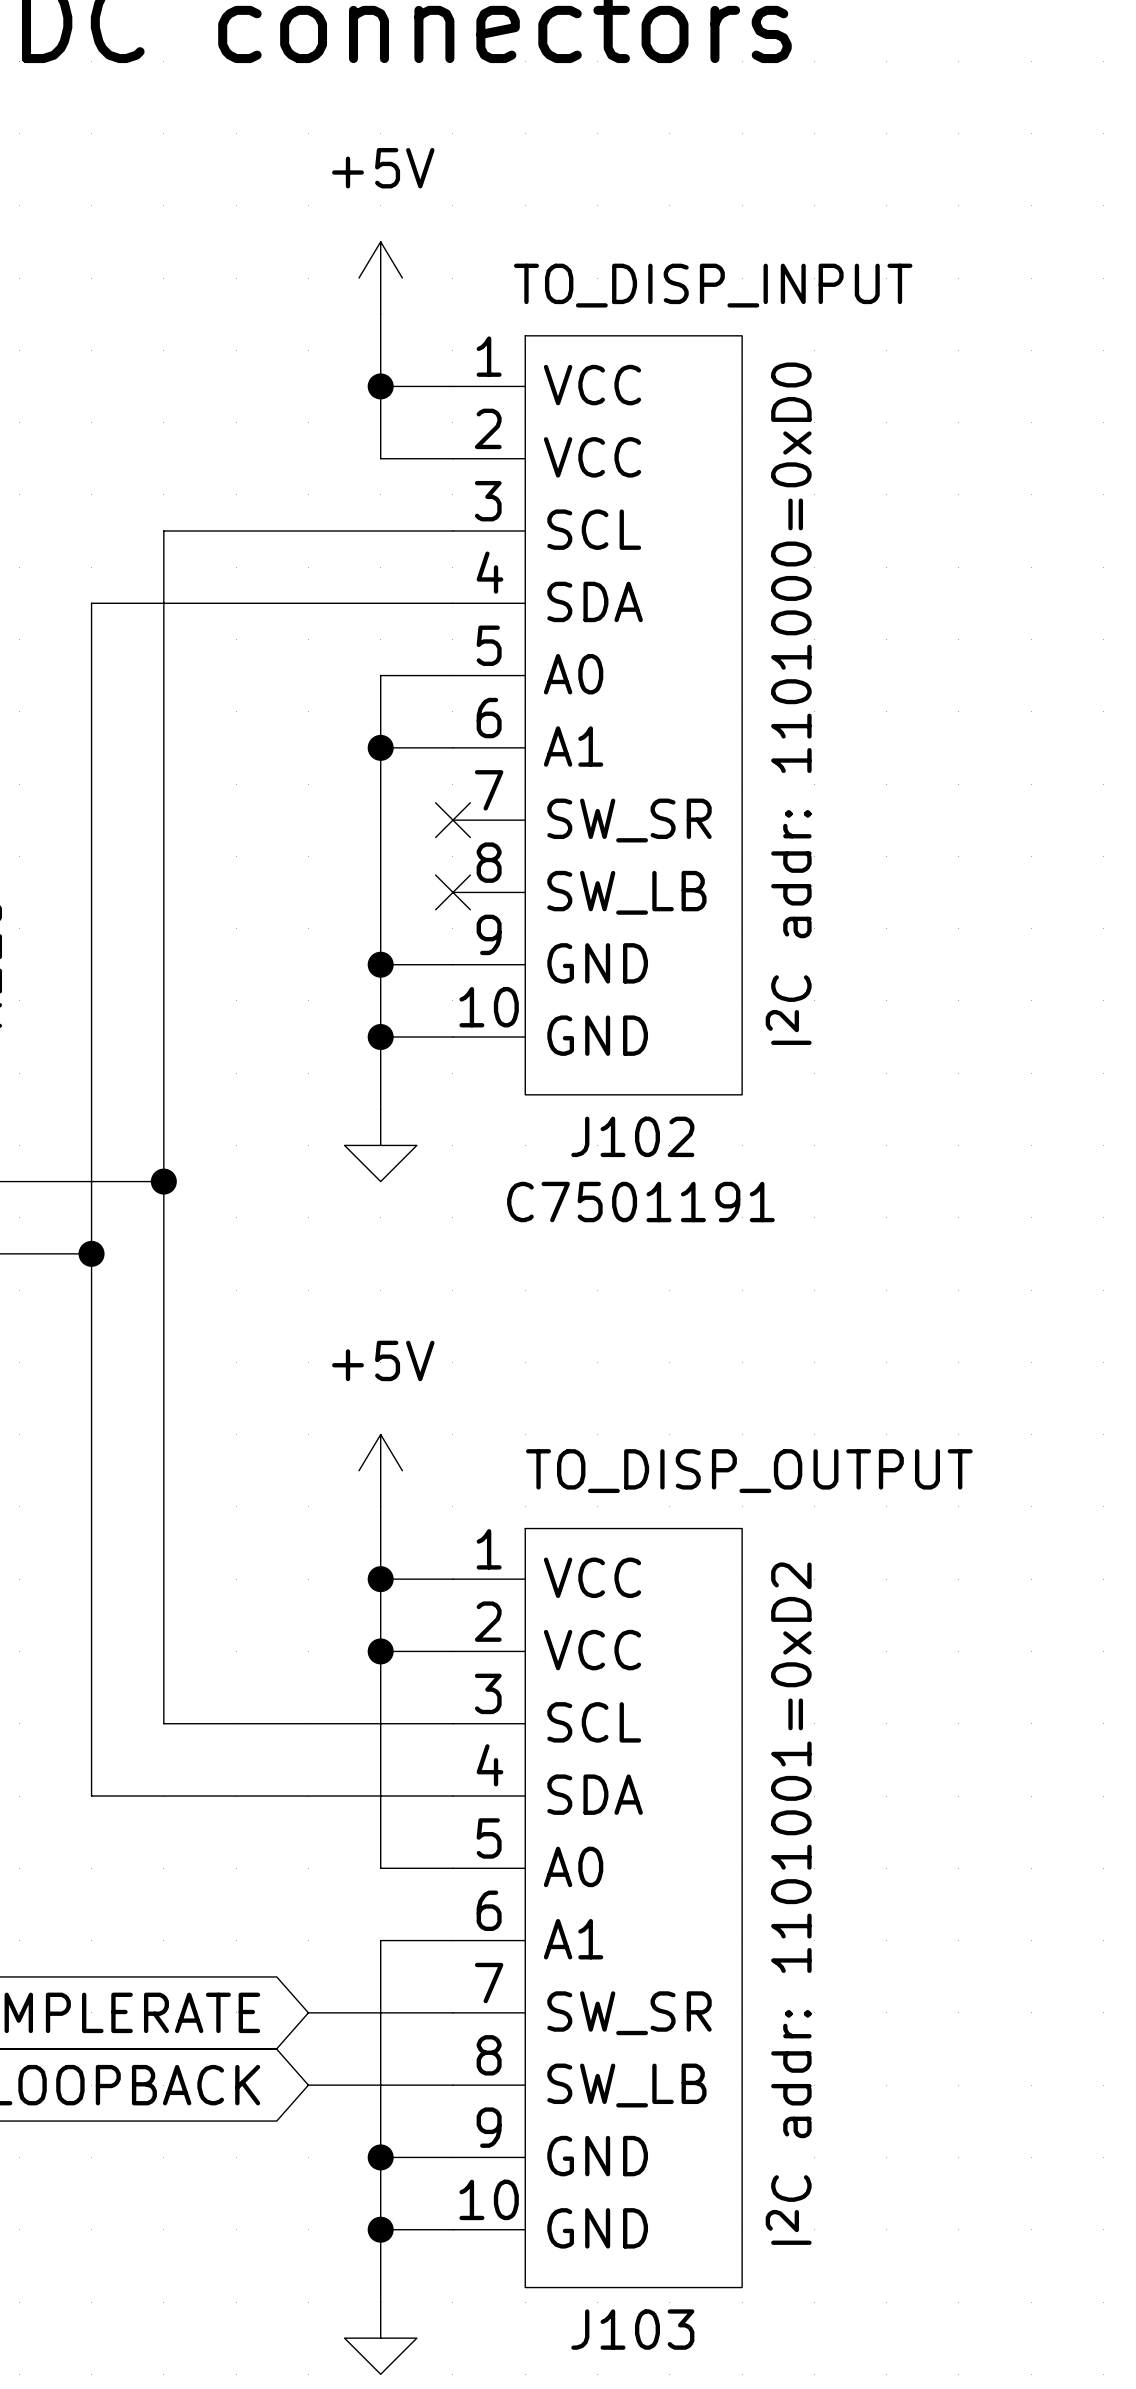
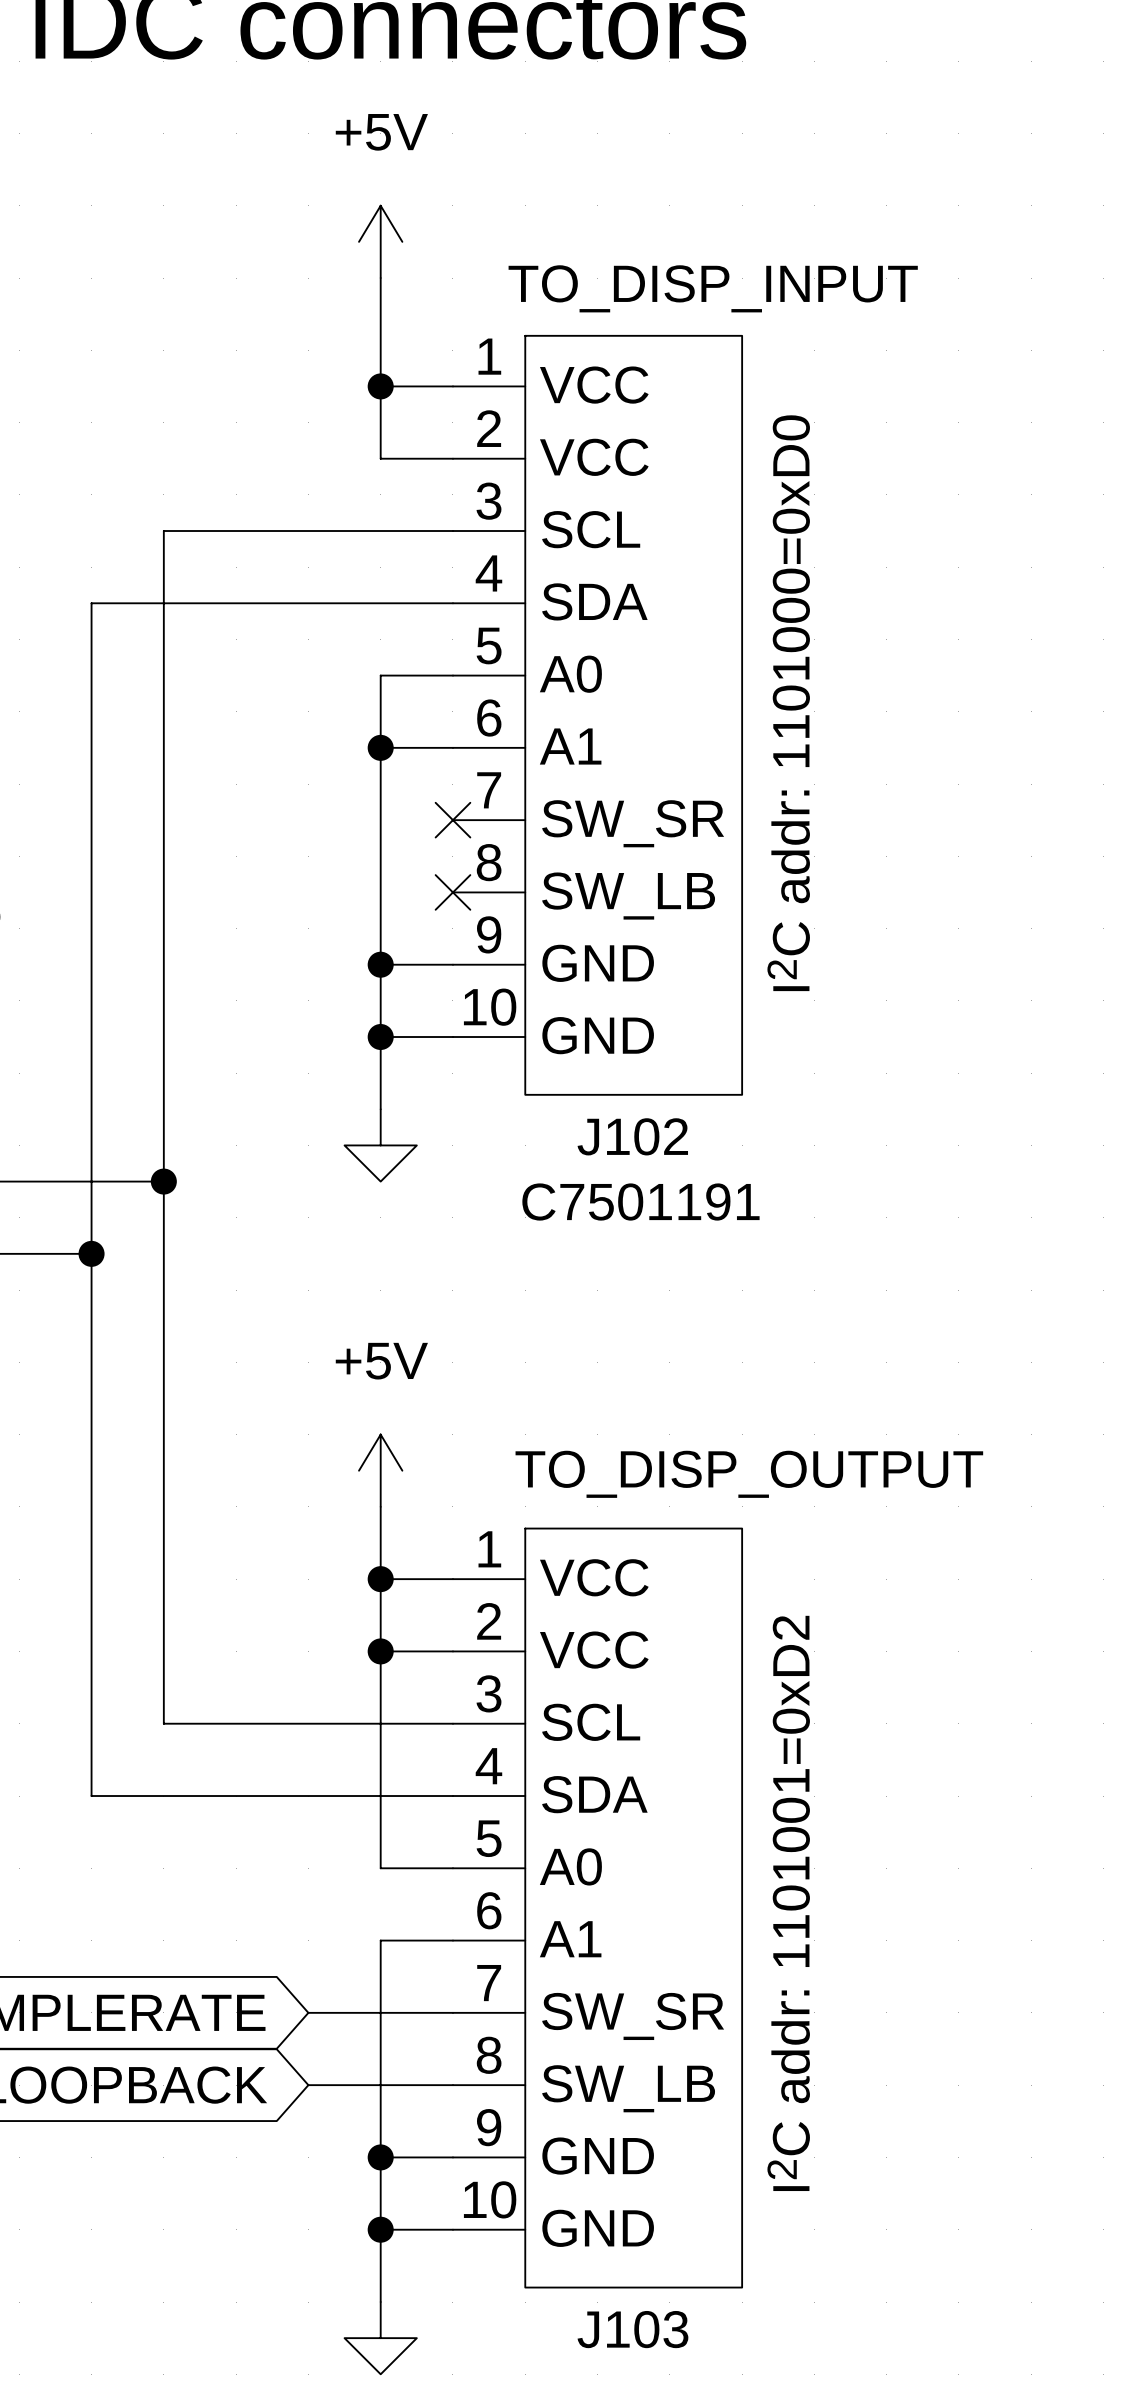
power symbol position: +5V (380, 278) -> +5V (380, 241)

